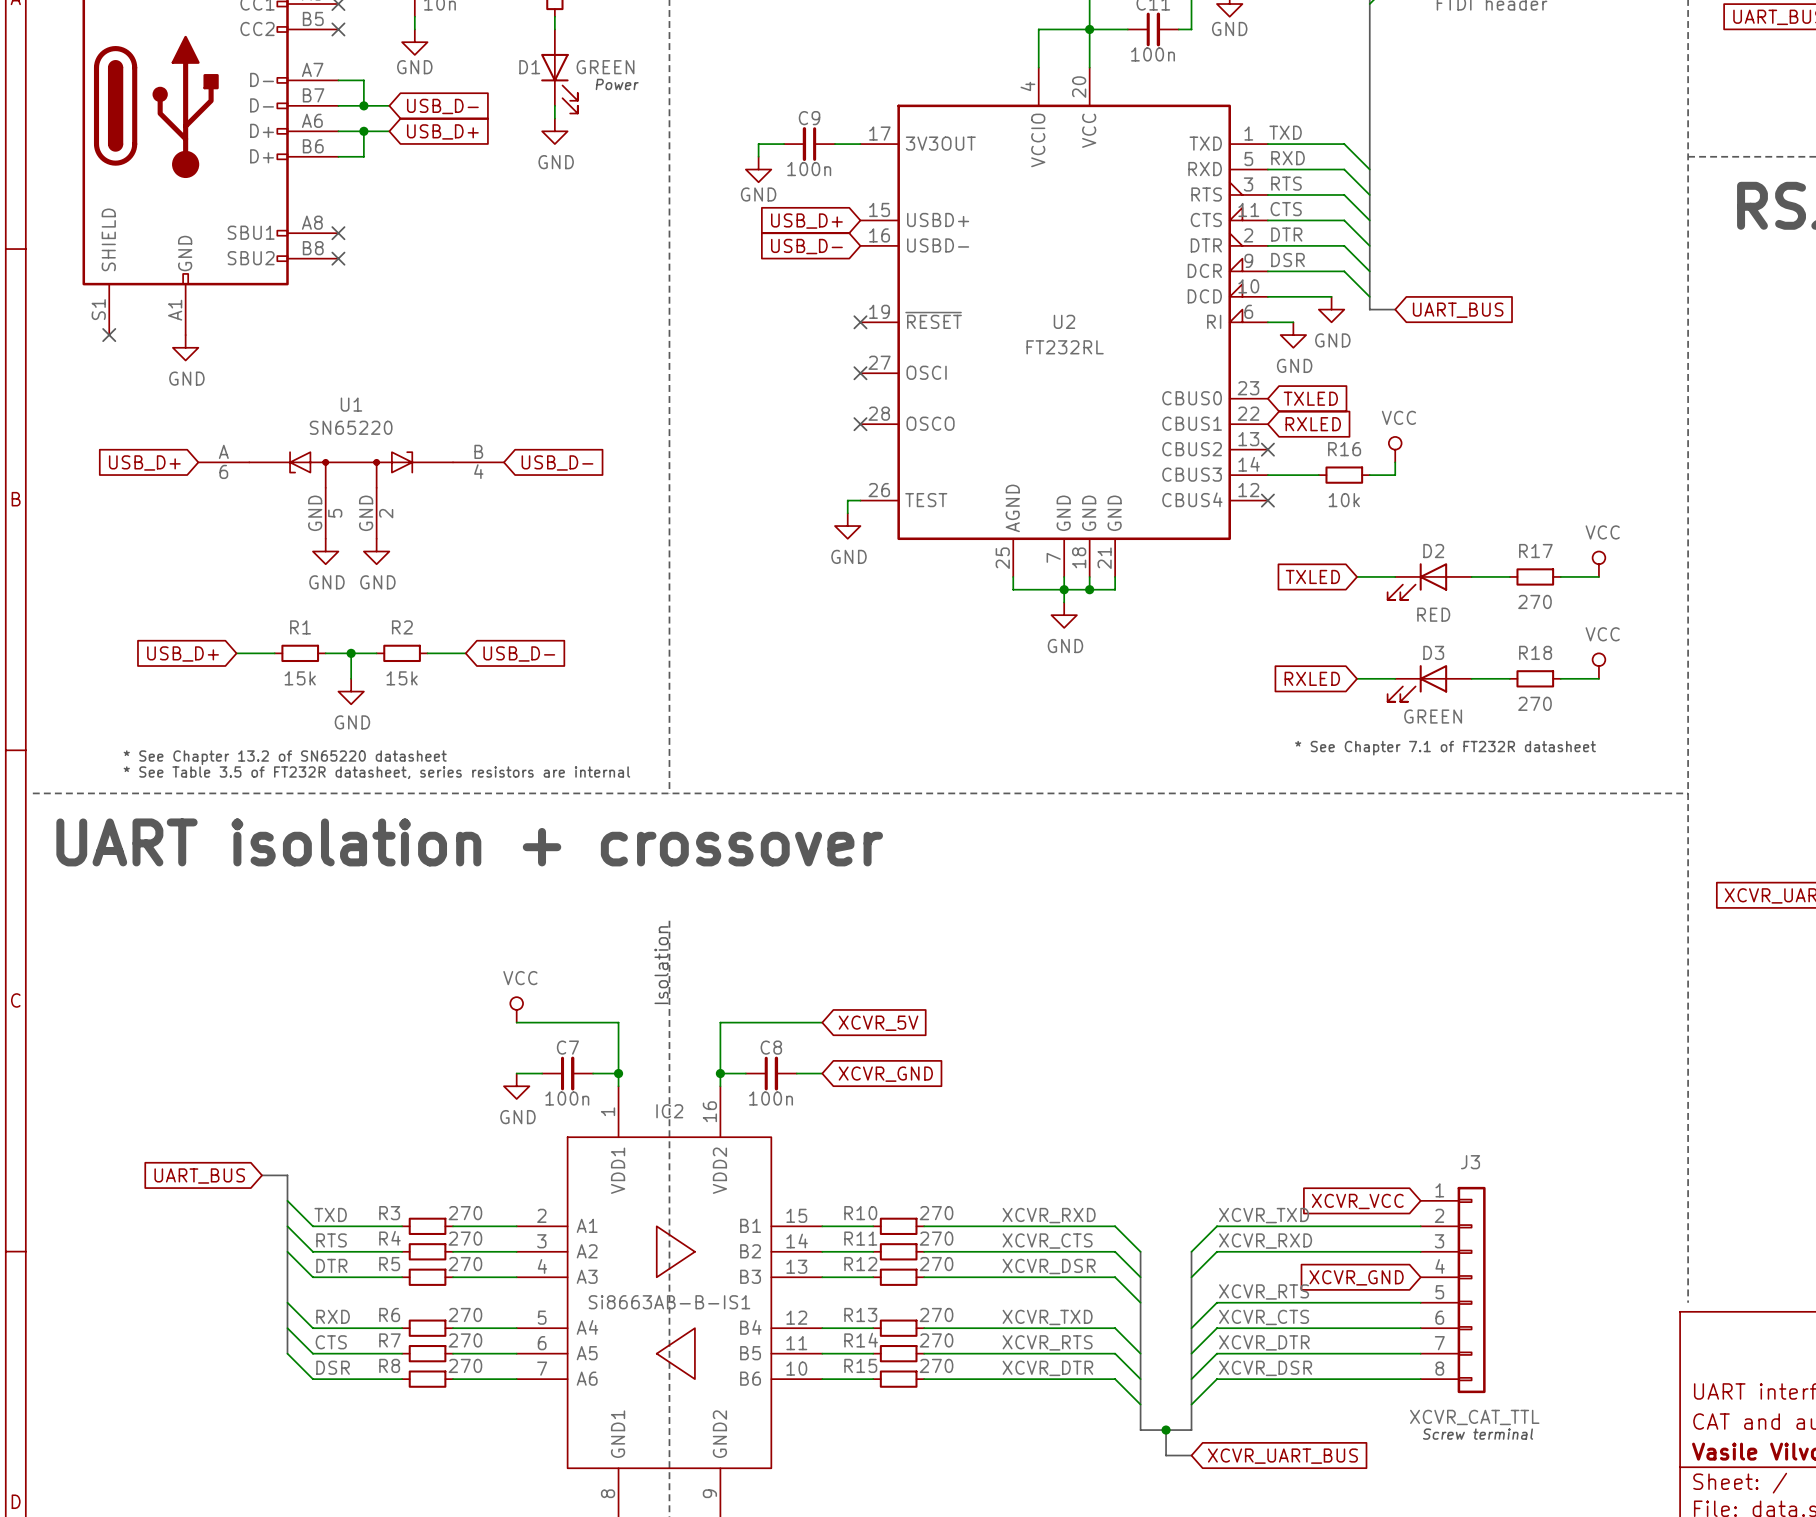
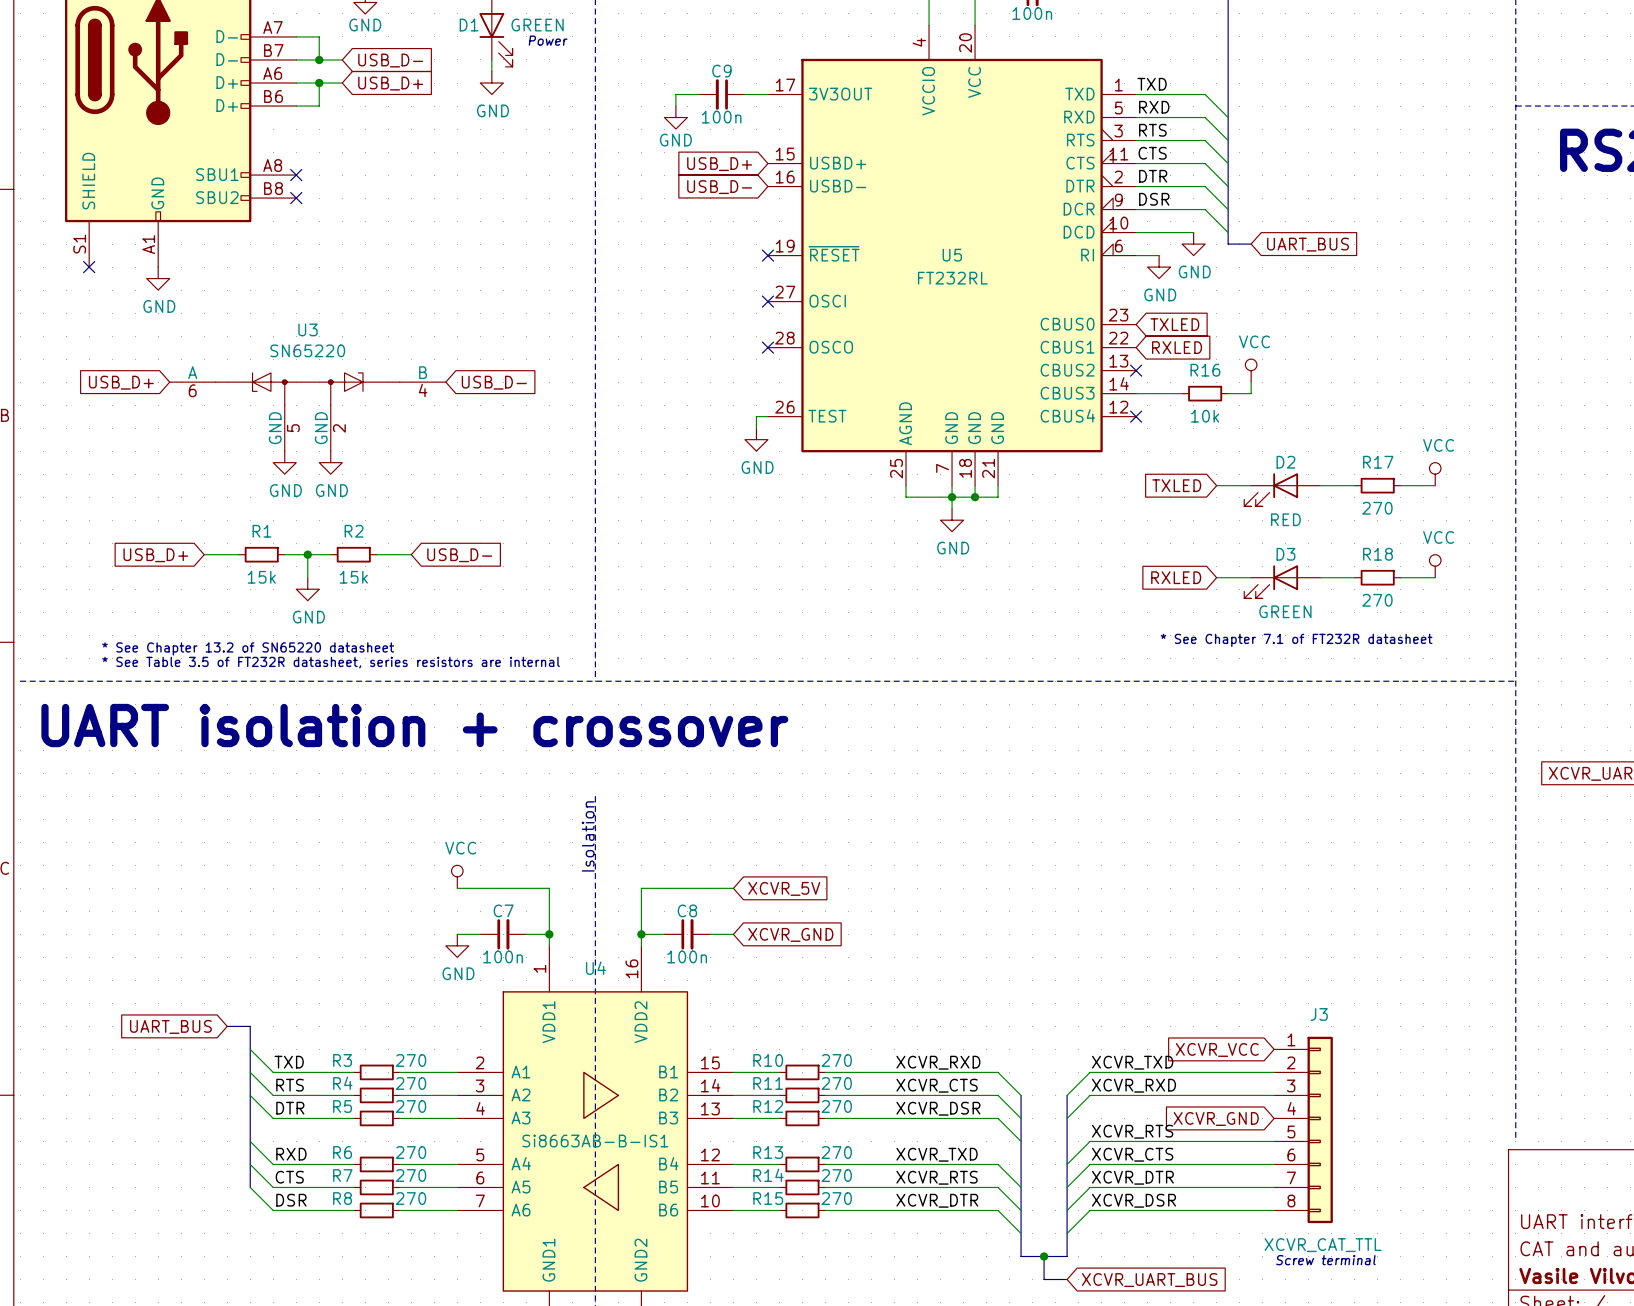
U2 name: U2 (1064, 321) -> U5 (952, 255)
U1 name: U1 (351, 404) -> U3 (308, 329)
IC2 name: IC2 (669, 1111) -> U4 (595, 968)

